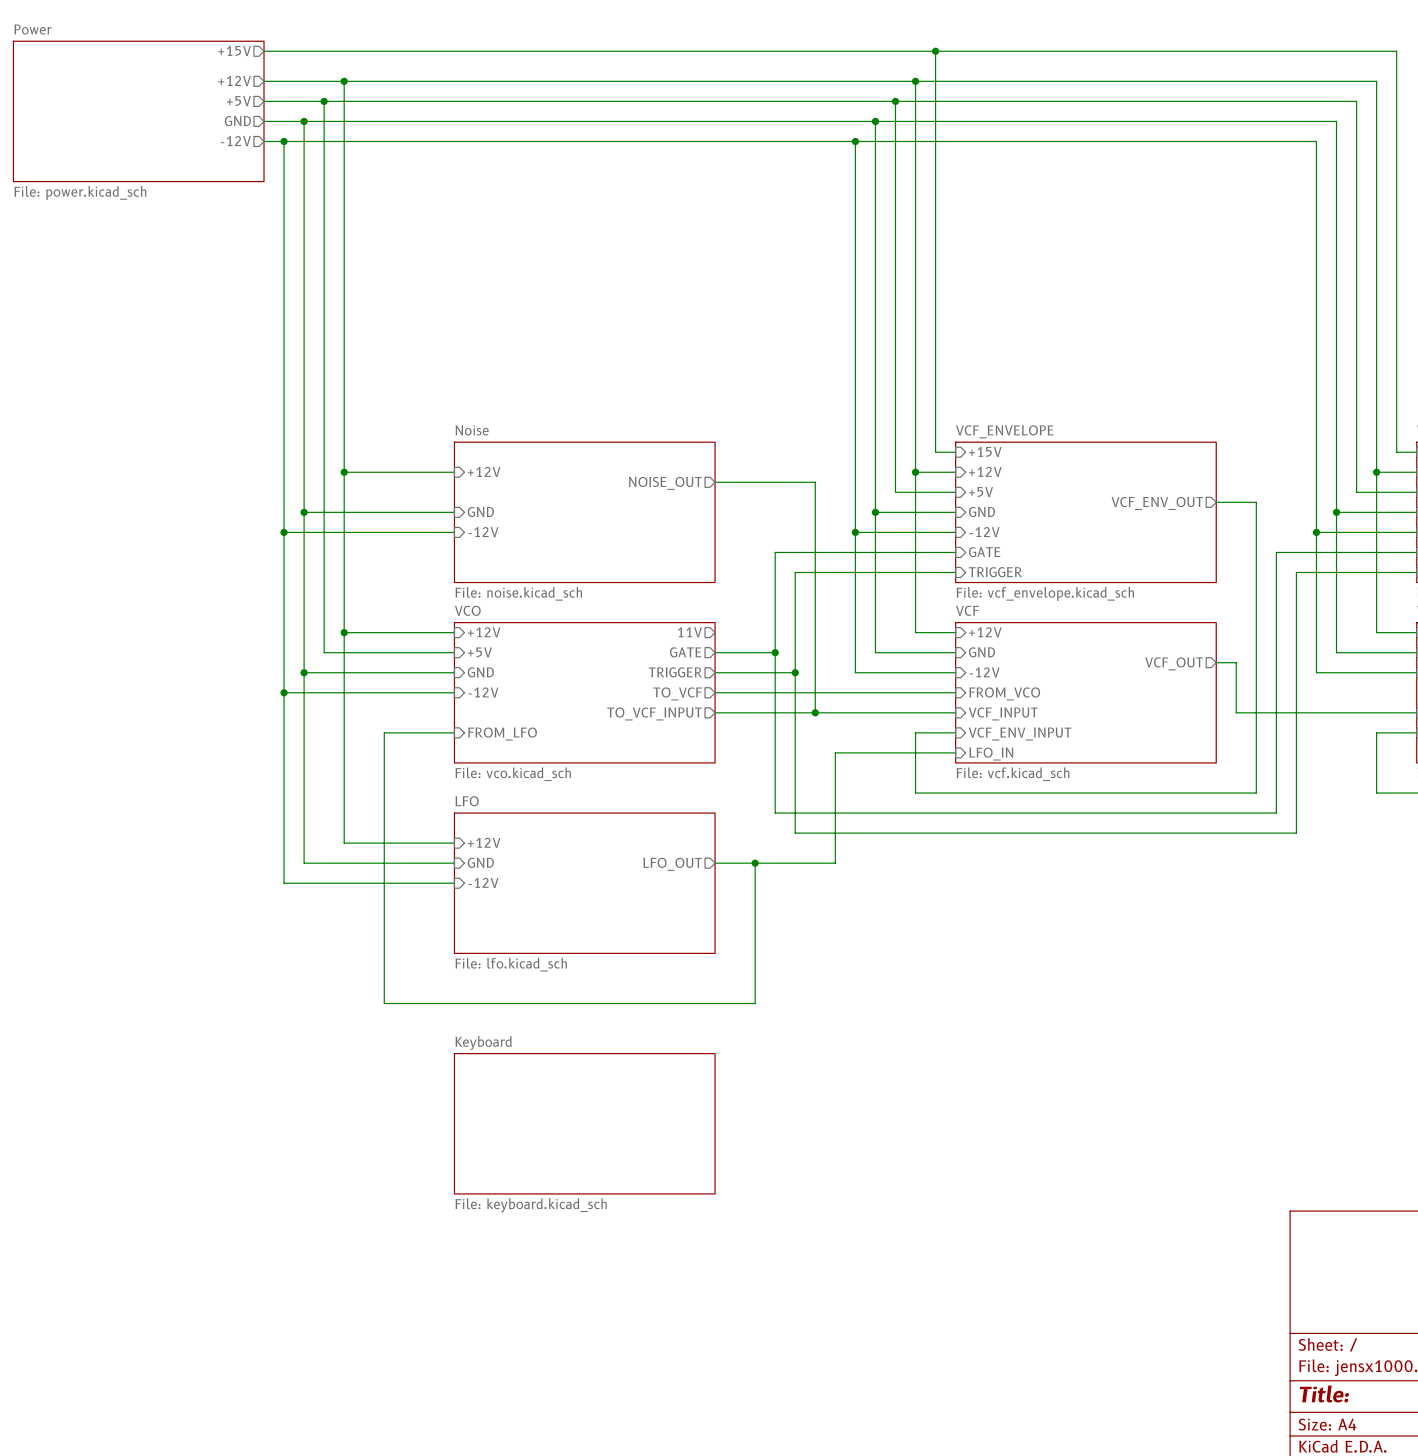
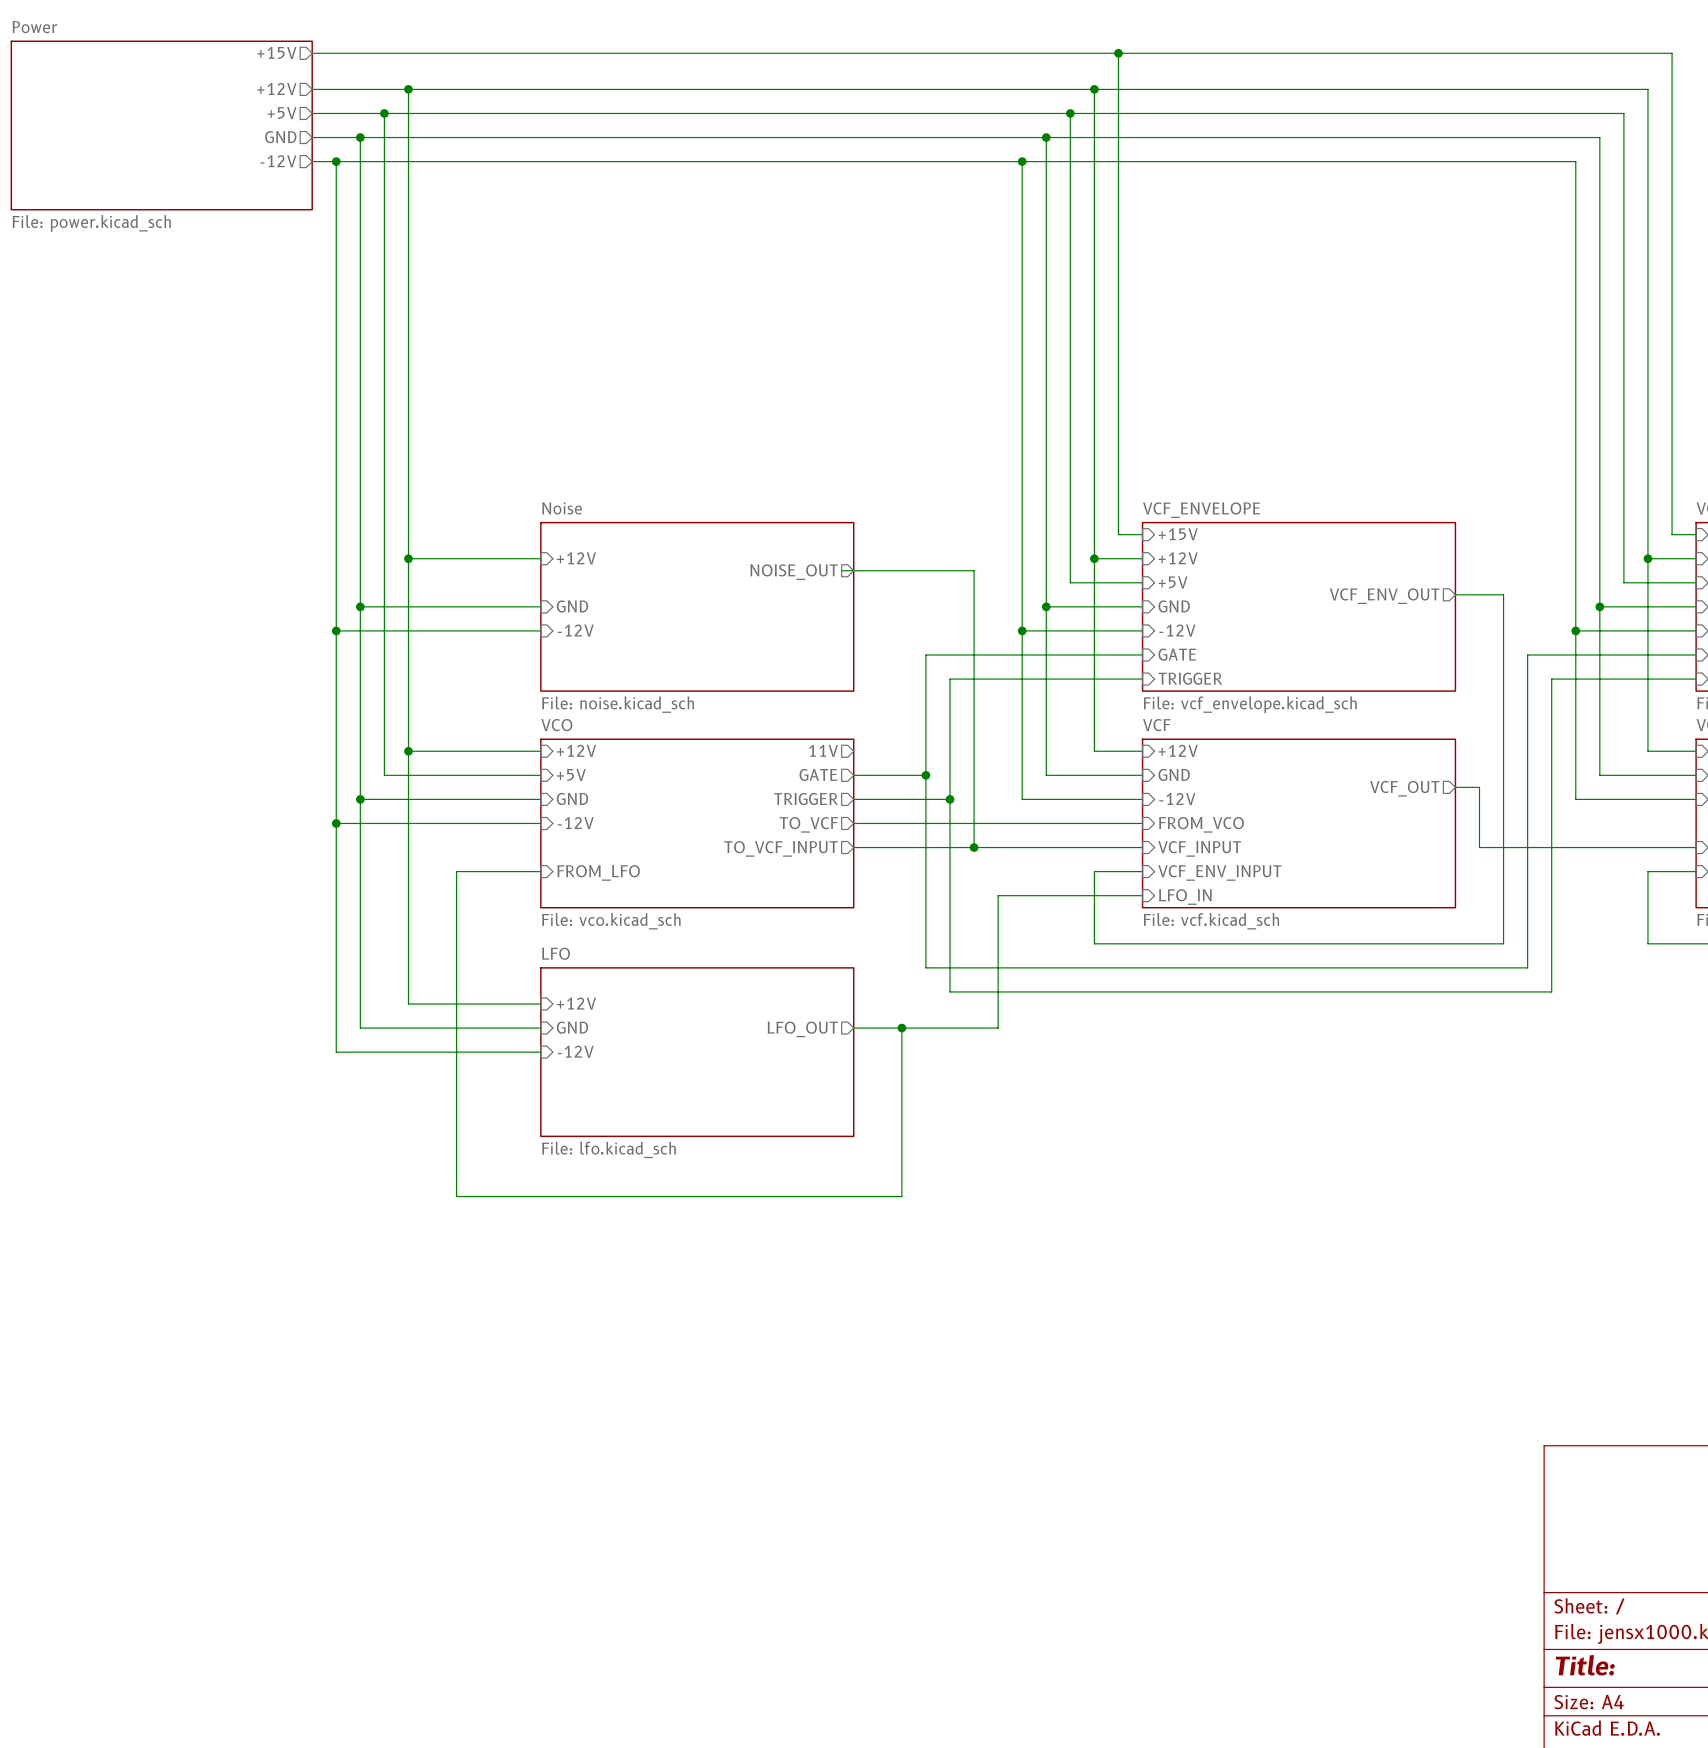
wire: none -> (841, 570) (853, 570)
sheet Keyboard: File: keyboard.kicad_sch (584, 1123) -> none

